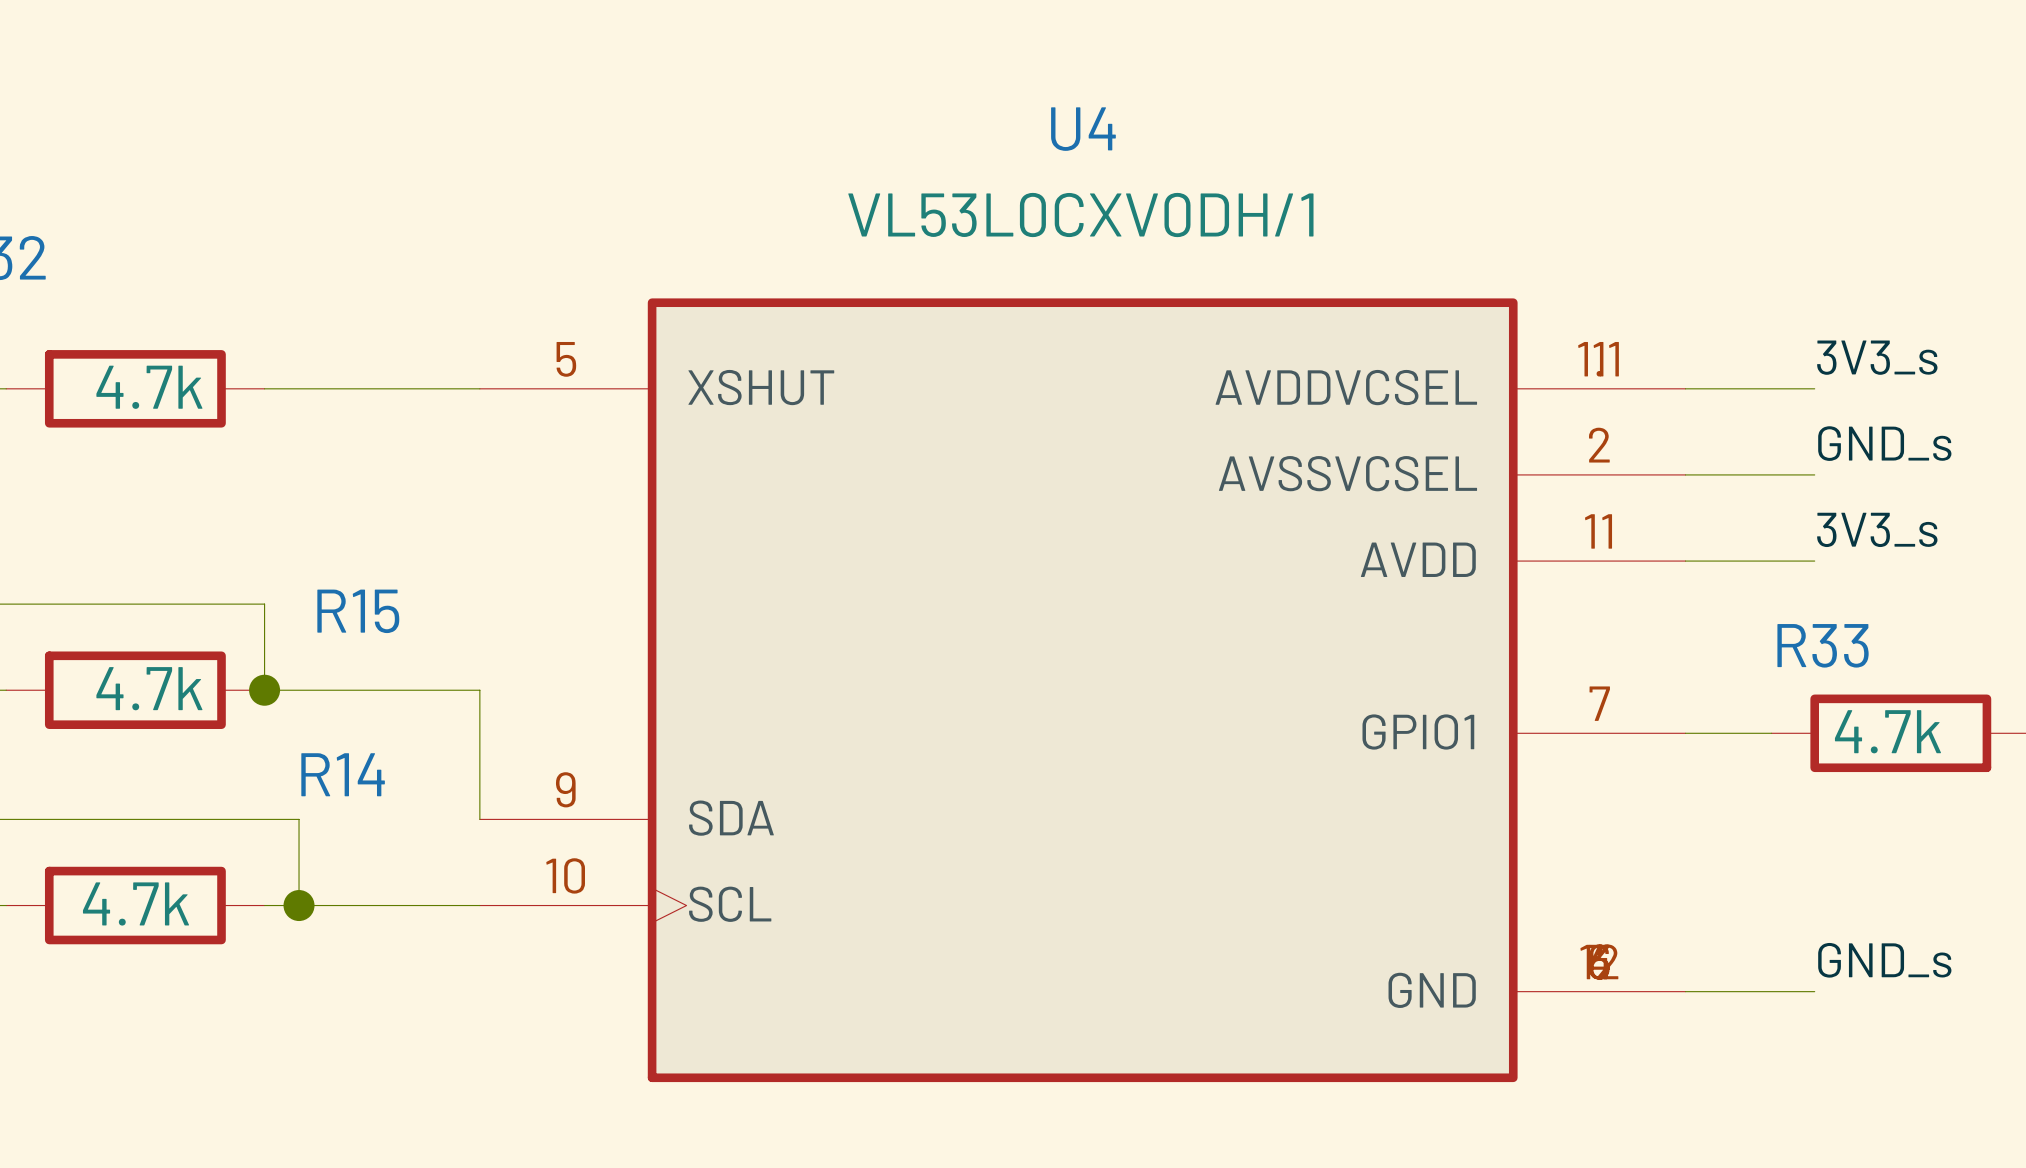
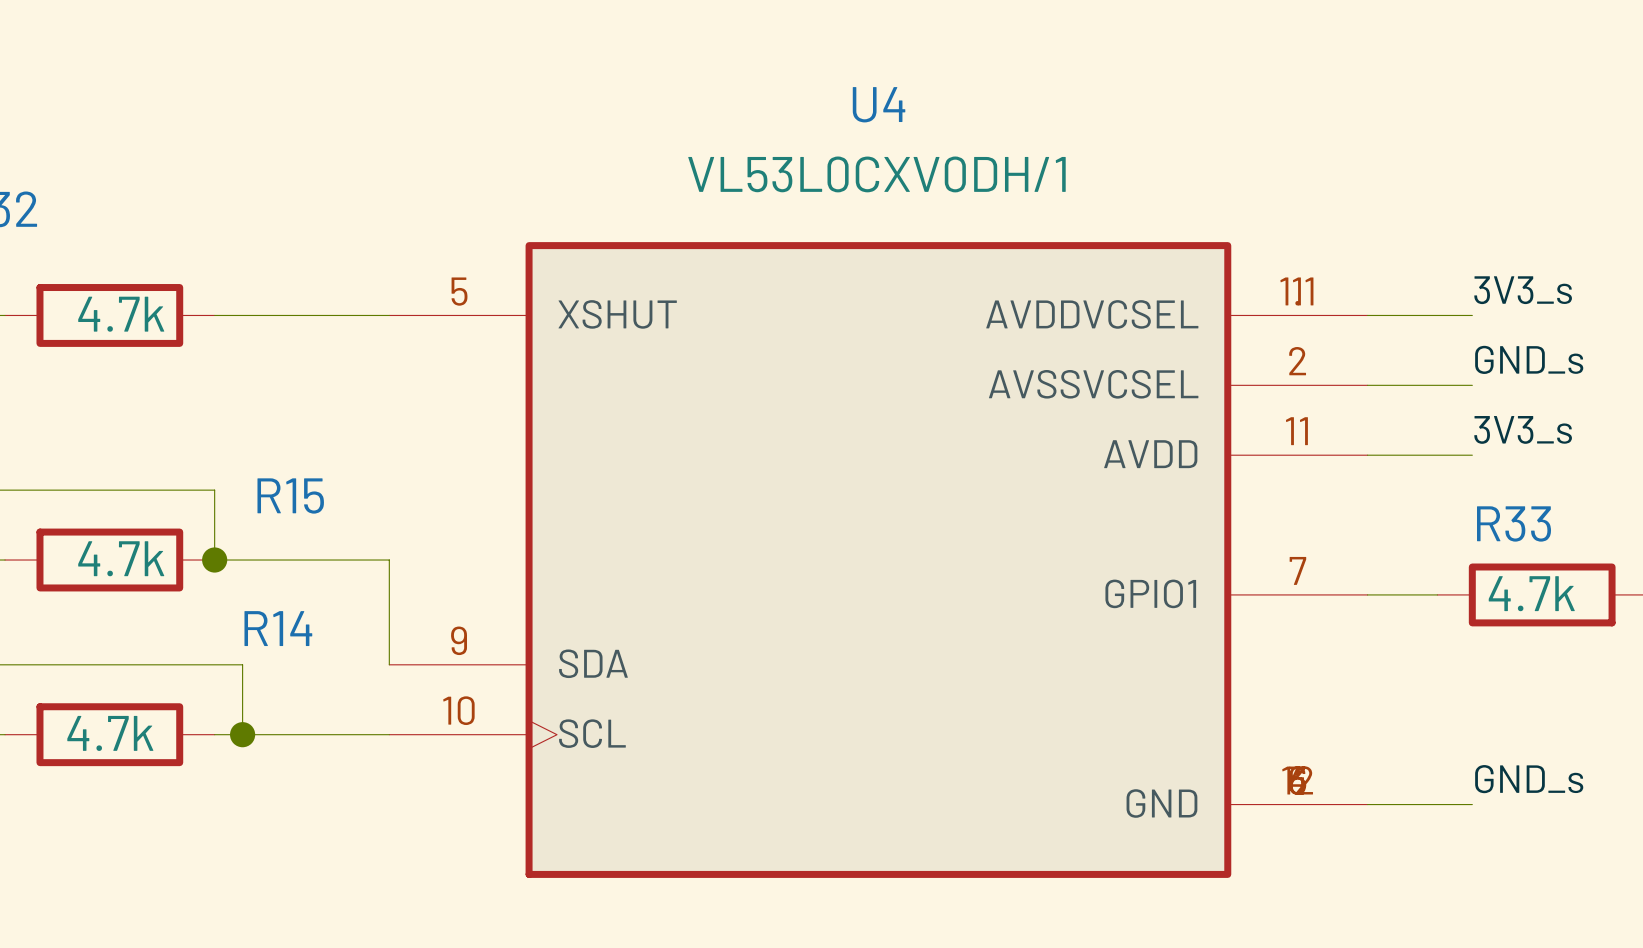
R33 name position: R33 (1823, 645) -> R33 (1514, 523)

